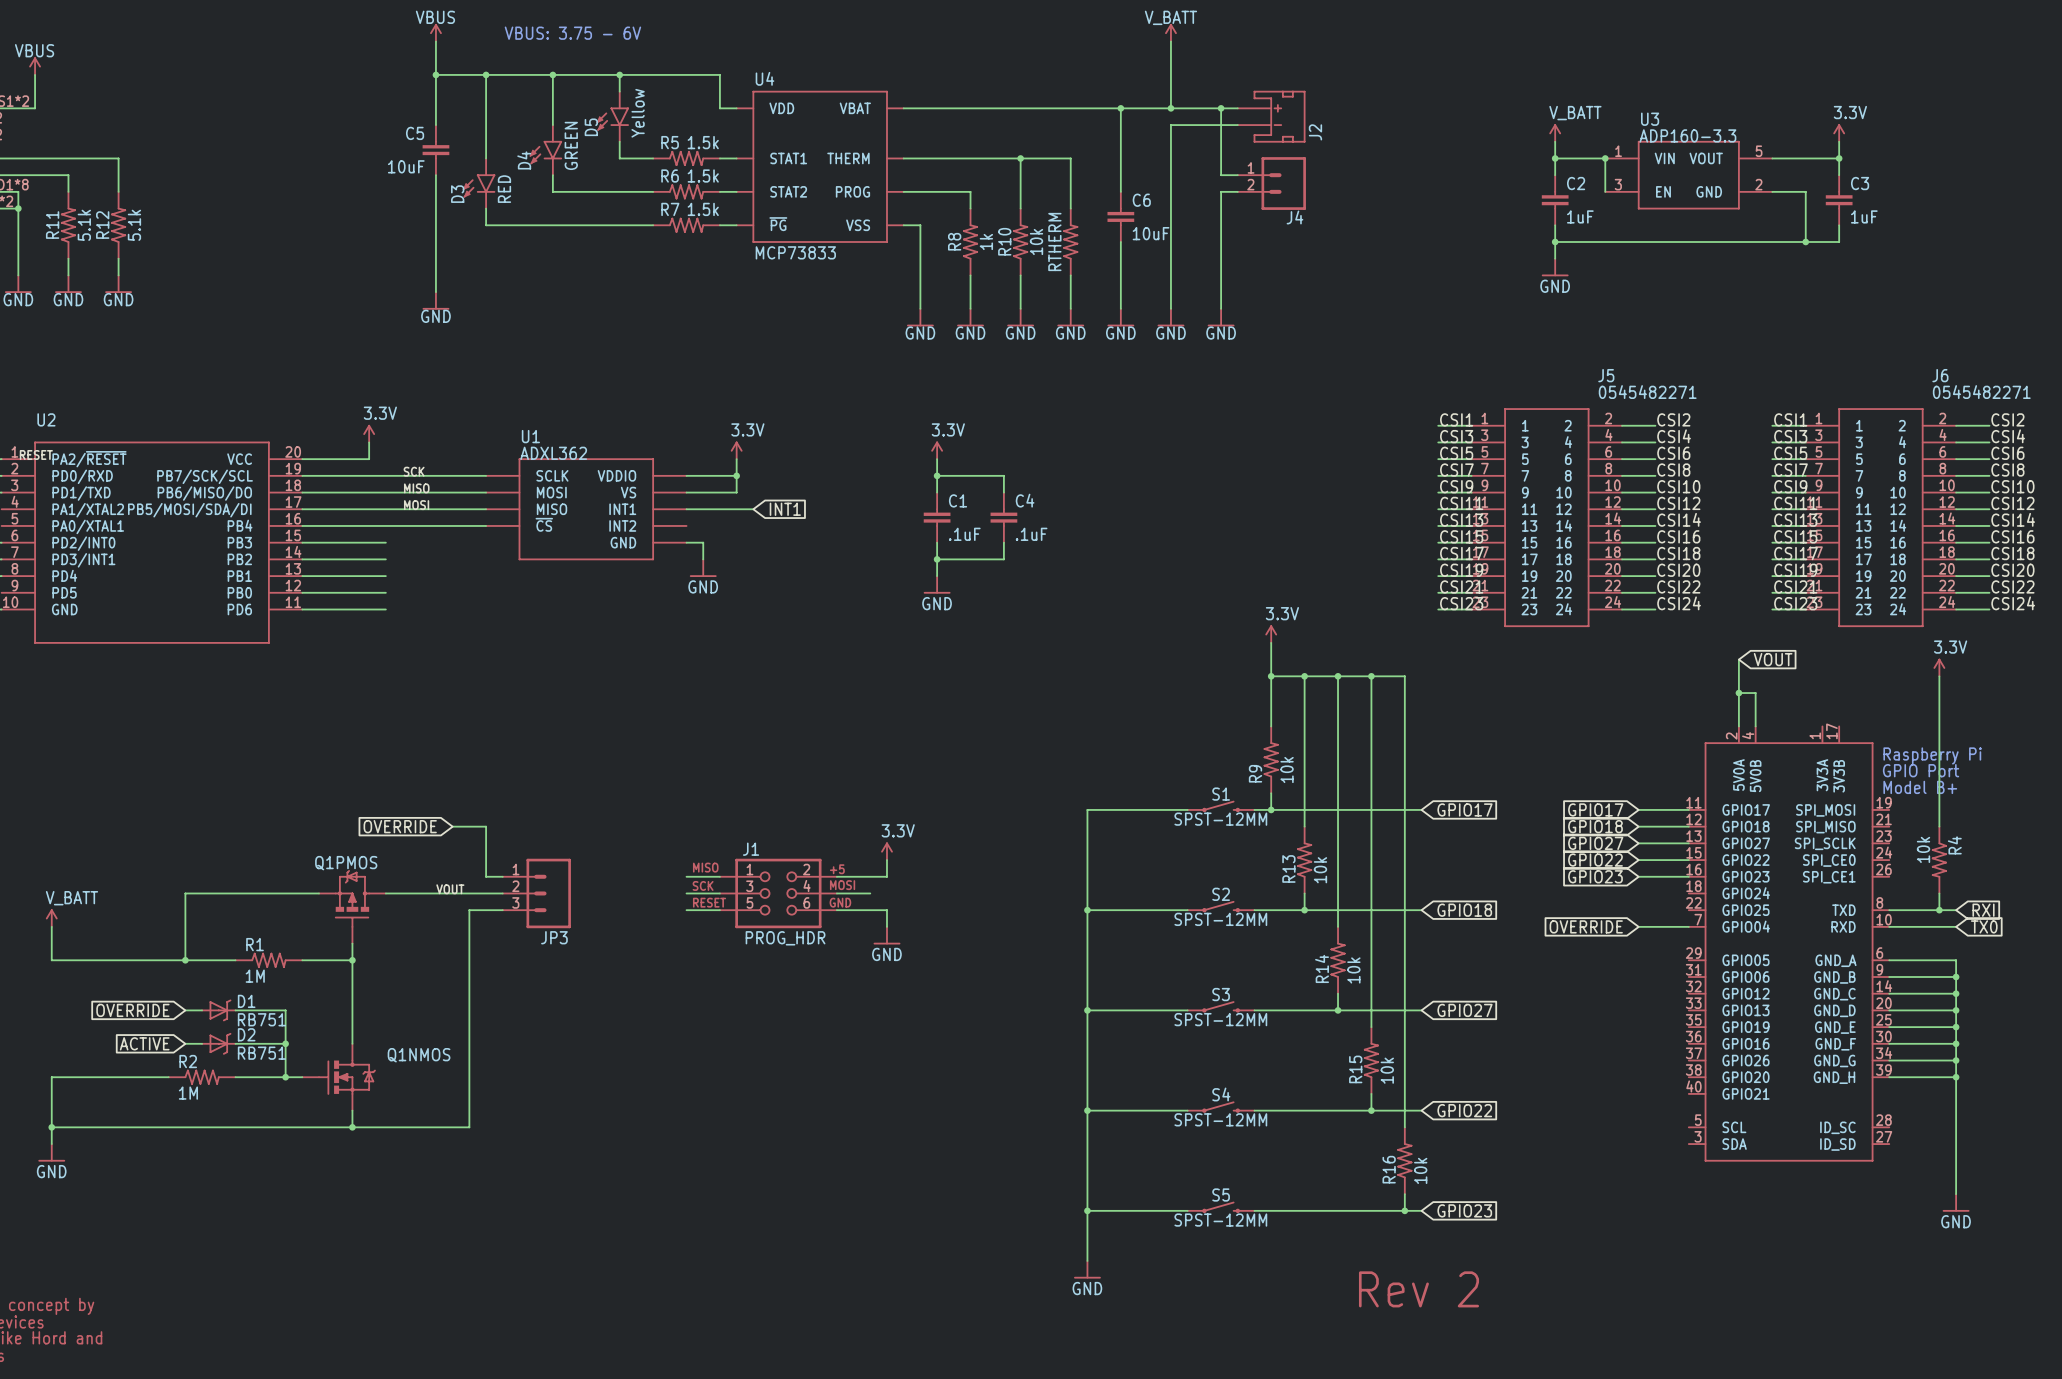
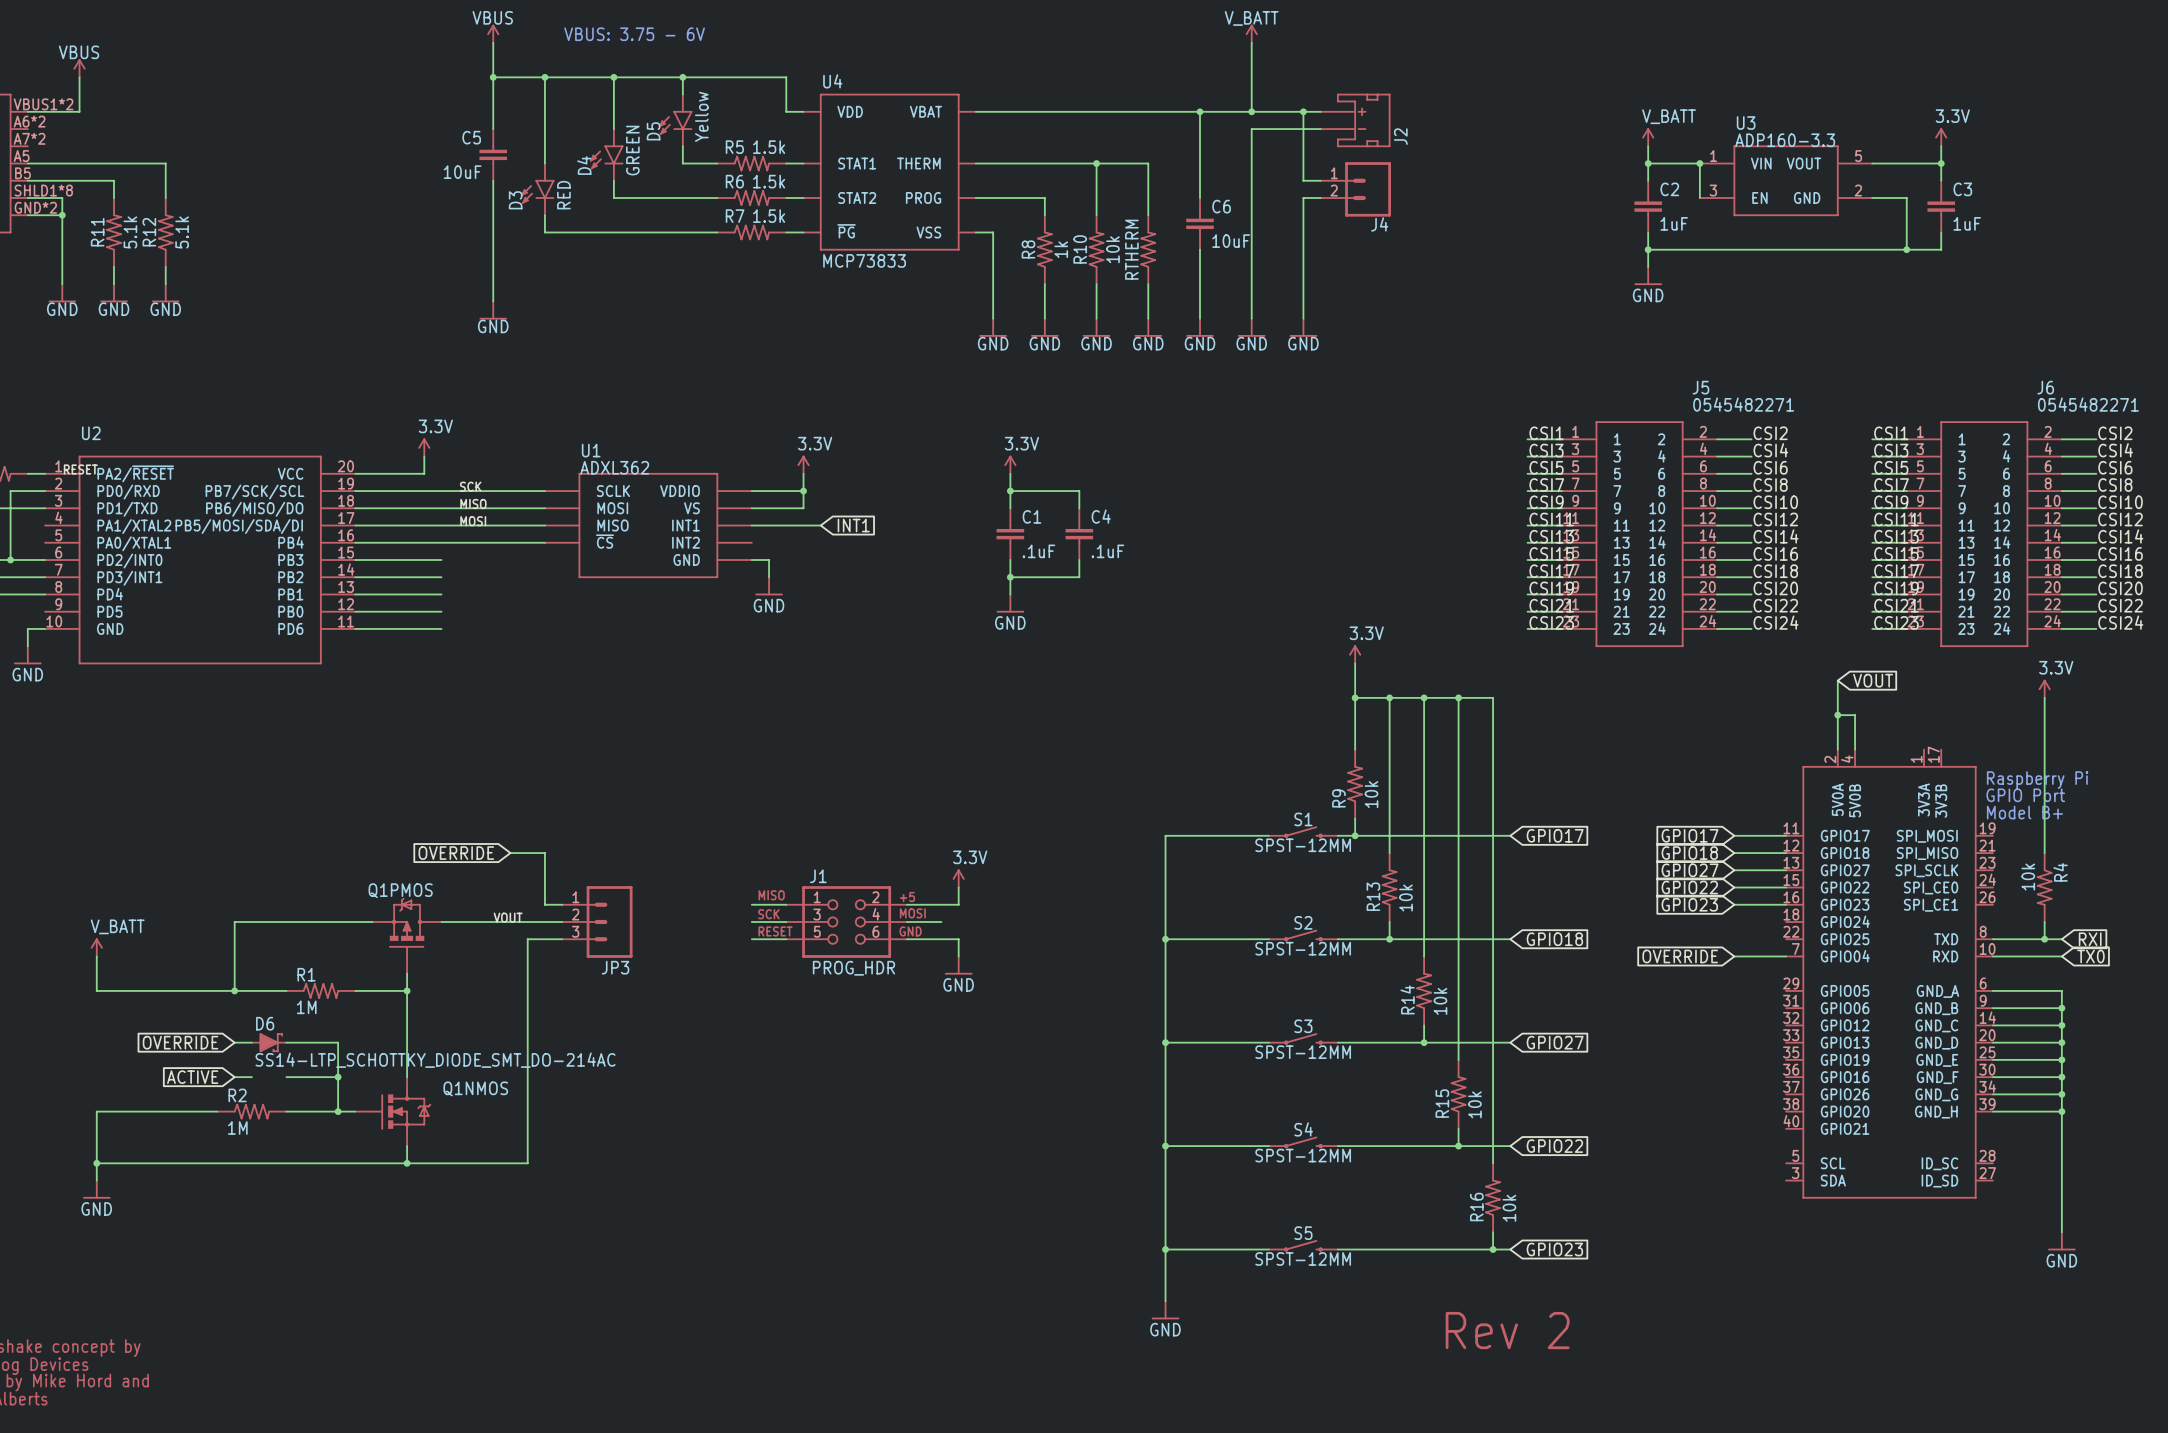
D1: RB751 (218, 1010) -> none
D6: none -> SS14-LTP_SCHOTTKY_DIODE_SMT_DO-214AC (269, 1042)
D2: RB751 (218, 1043) -> none

